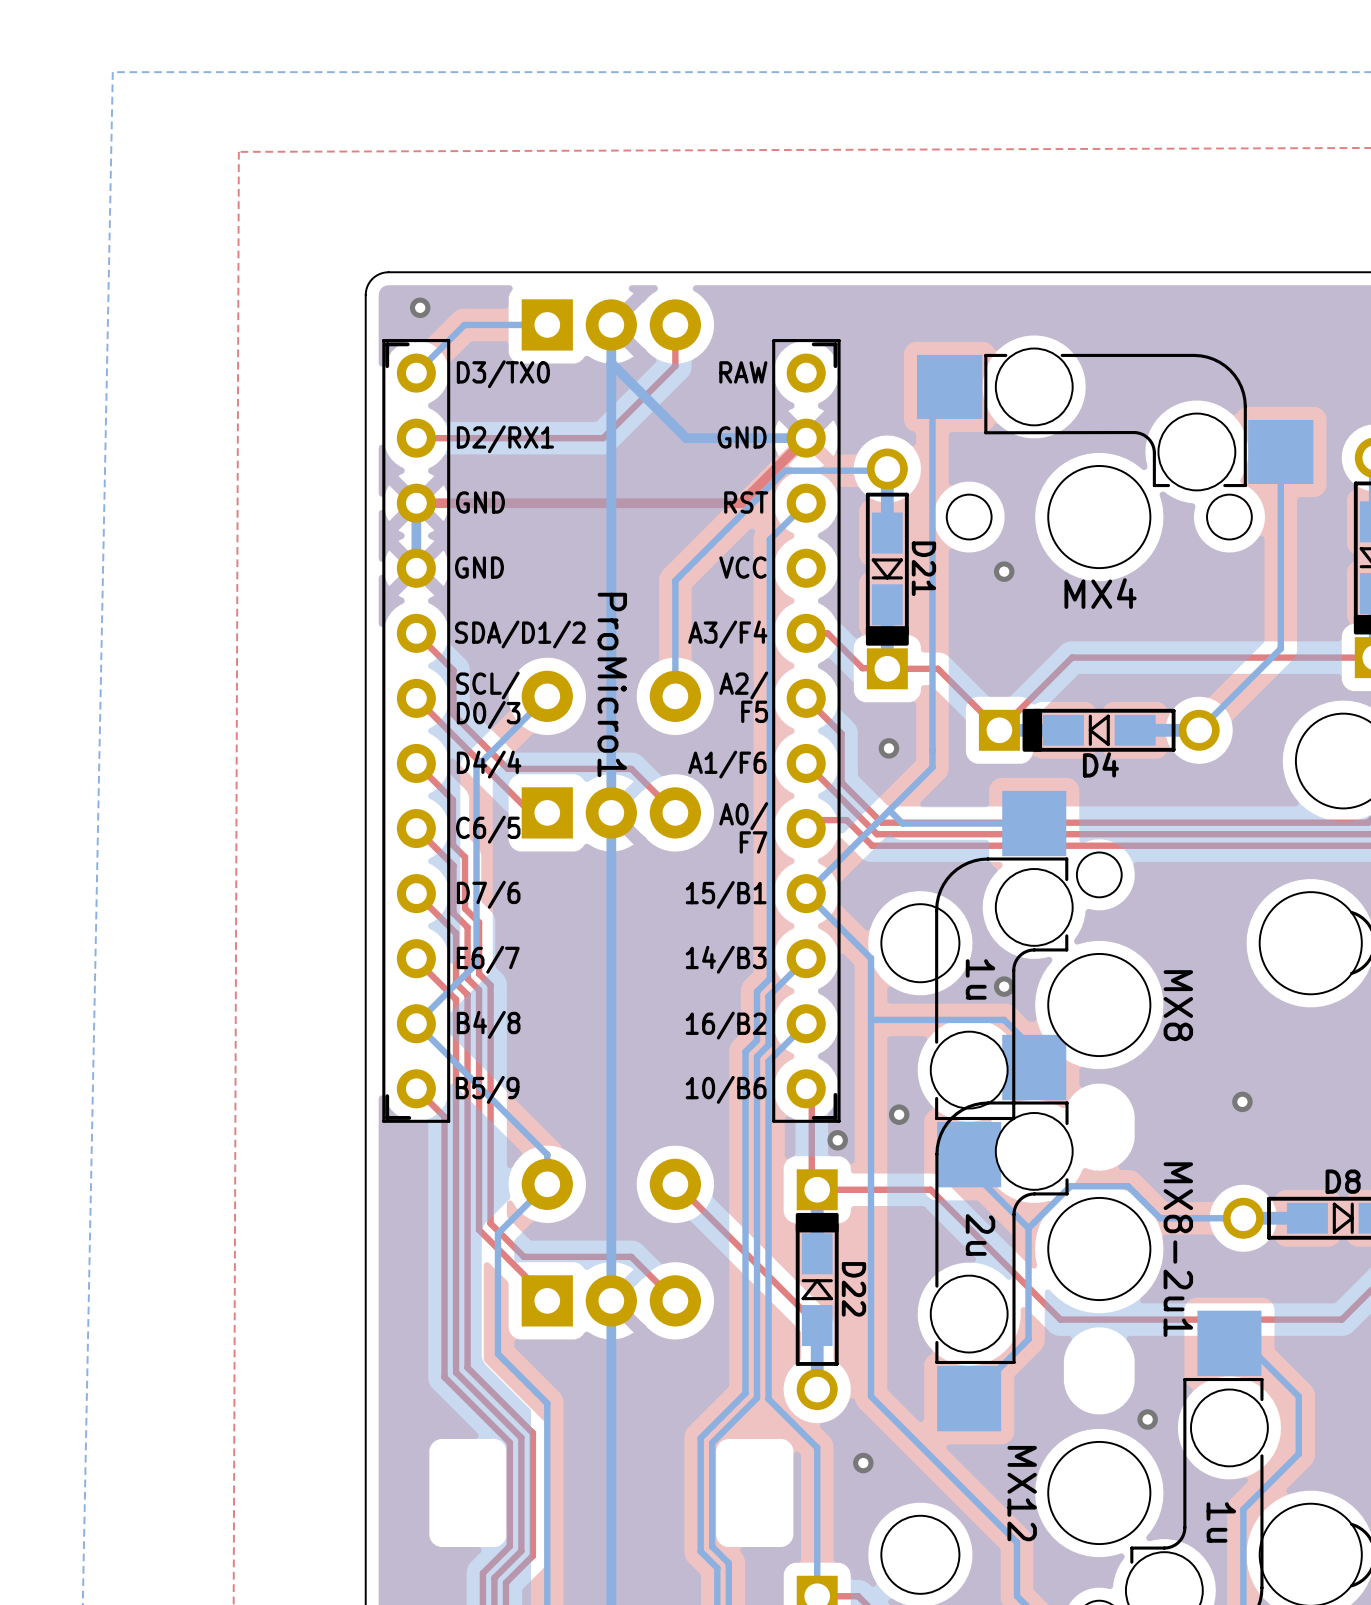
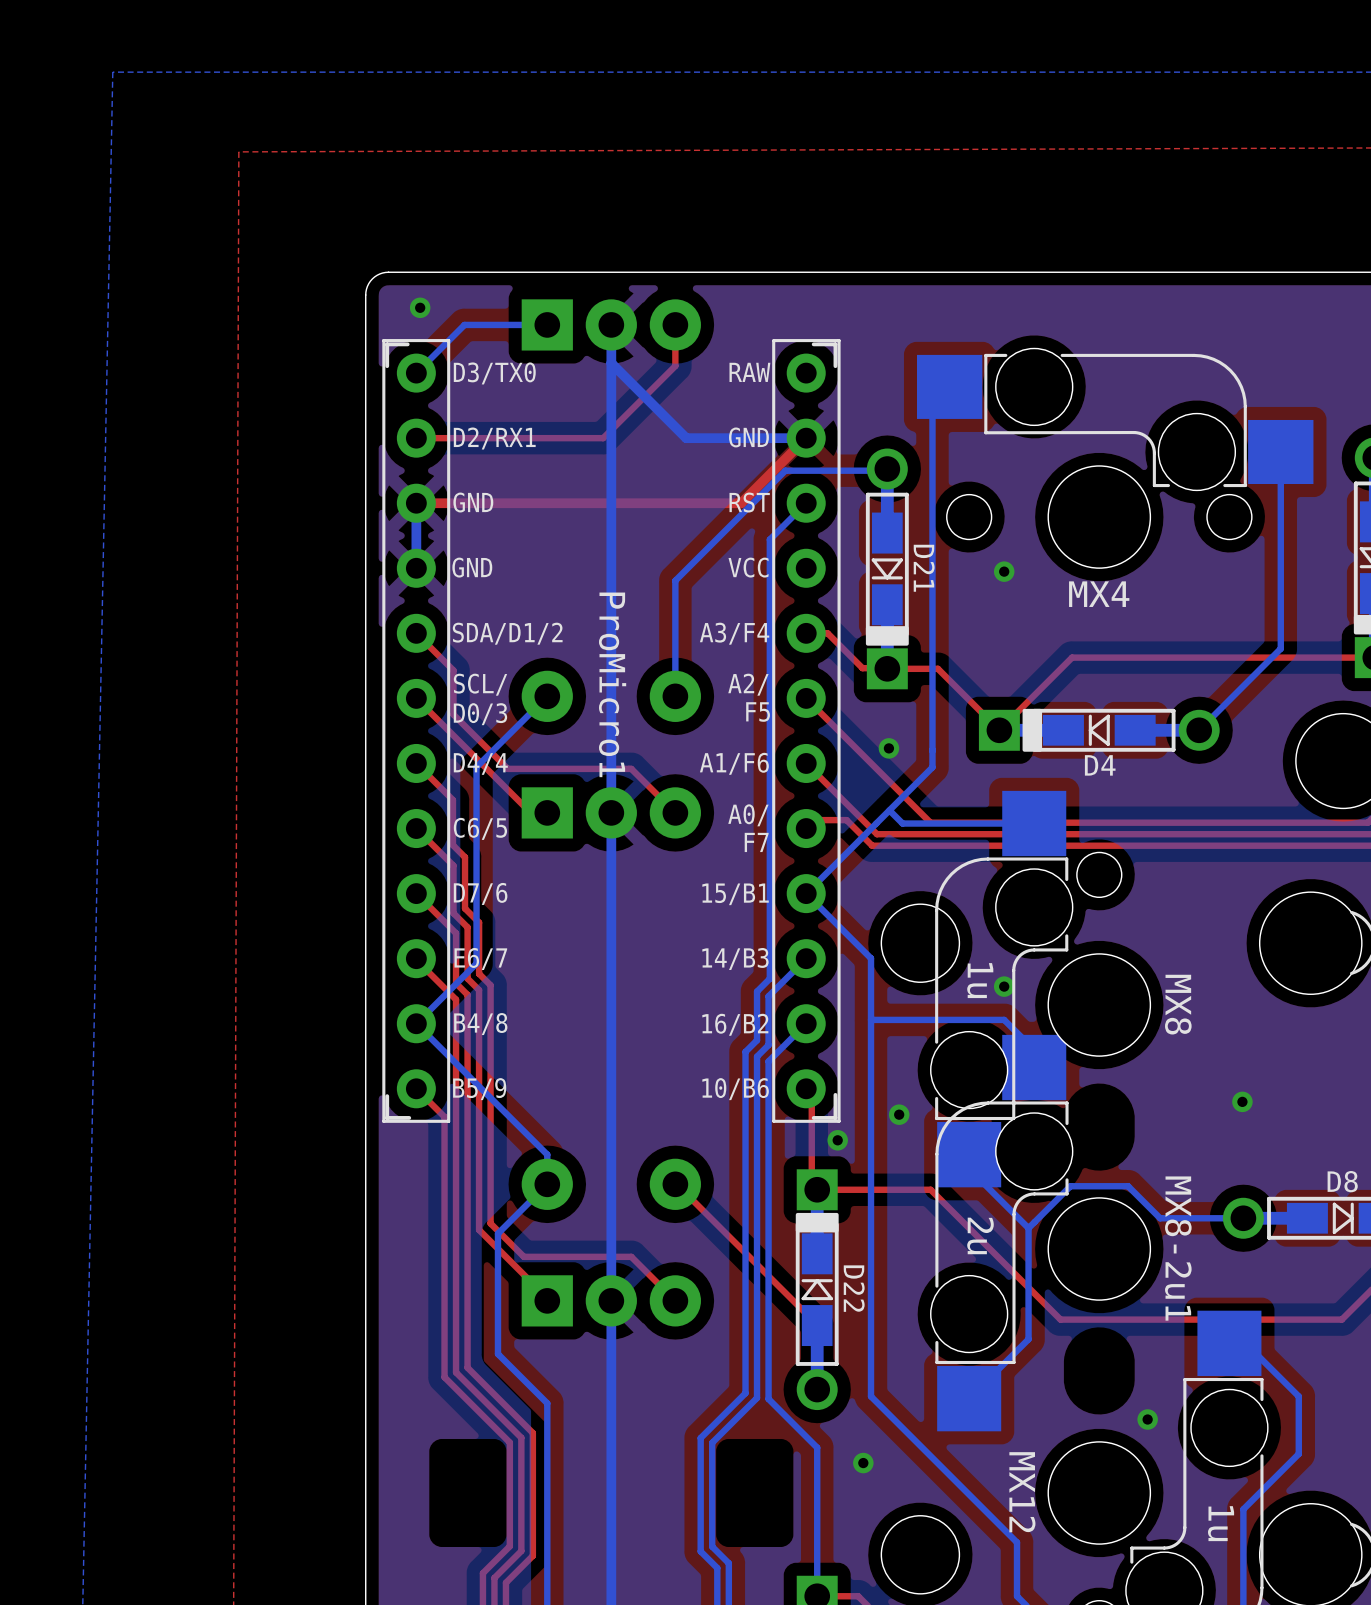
top track: (841, 733) (841, 782) (881, 822) (930, 822) -> (841, 733) (930, 822)

